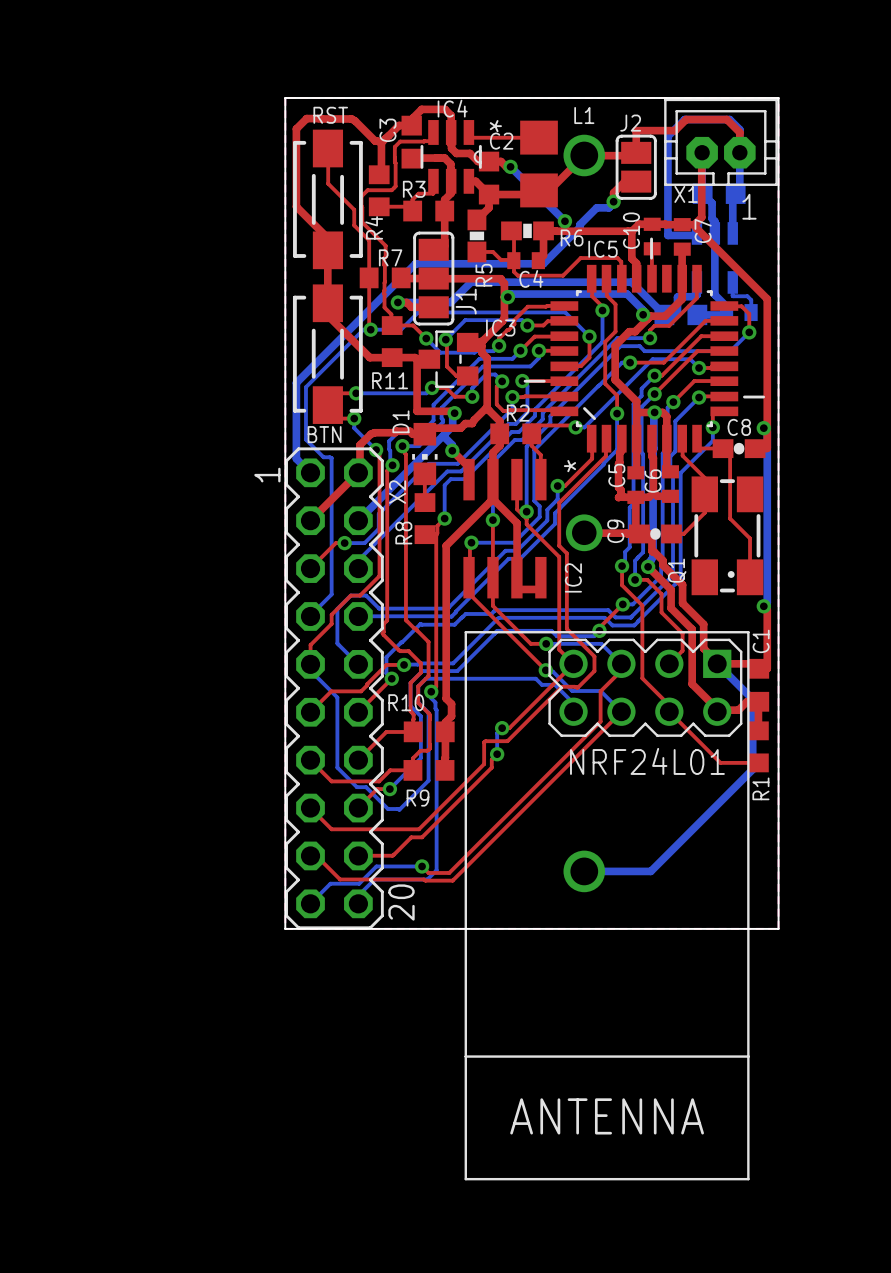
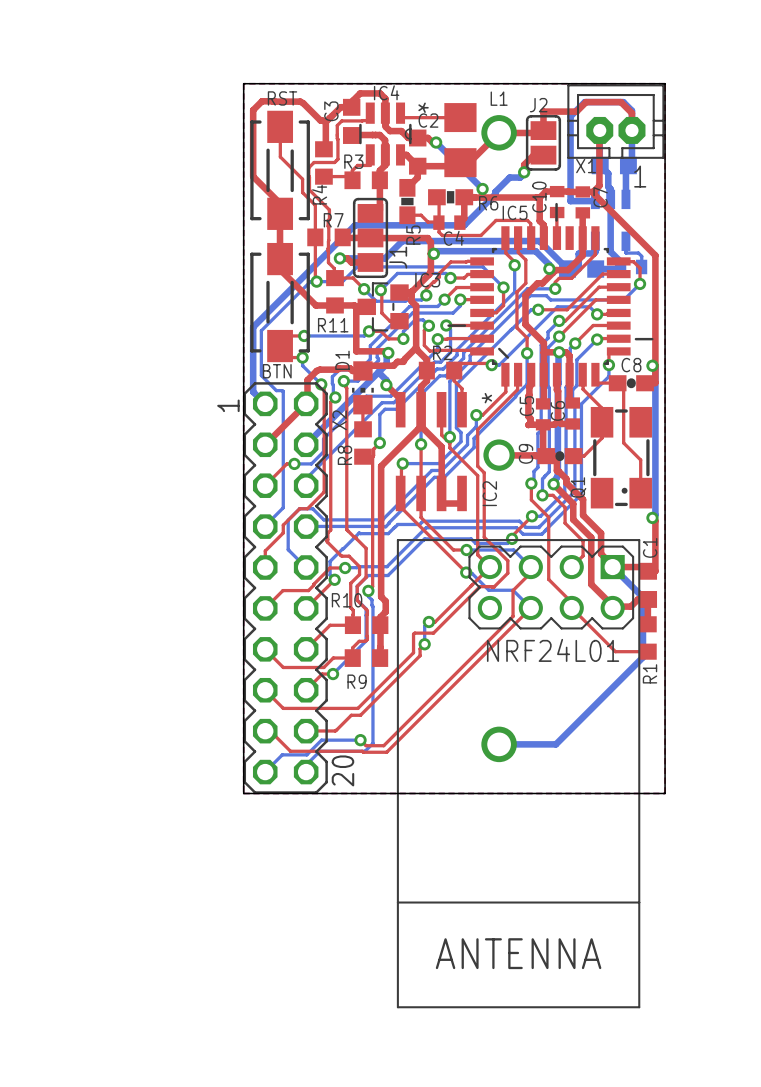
bottom track: (495, 632) (457, 671) (422, 671) (410, 682) (410, 705) (420, 716) (420, 758) -> (423, 540) (388, 575) (368, 575) (363, 579)
bottom track: (310, 664) (310, 670) (337, 697) (337, 767) (356, 787) (366, 787) (387, 809) (399, 809) (428, 780) (428, 750) -> (359, 647) (366, 640)
bottom track: (425, 678) (535, 678) (541, 684) (555, 684) (573, 703) (573, 711) -> none

